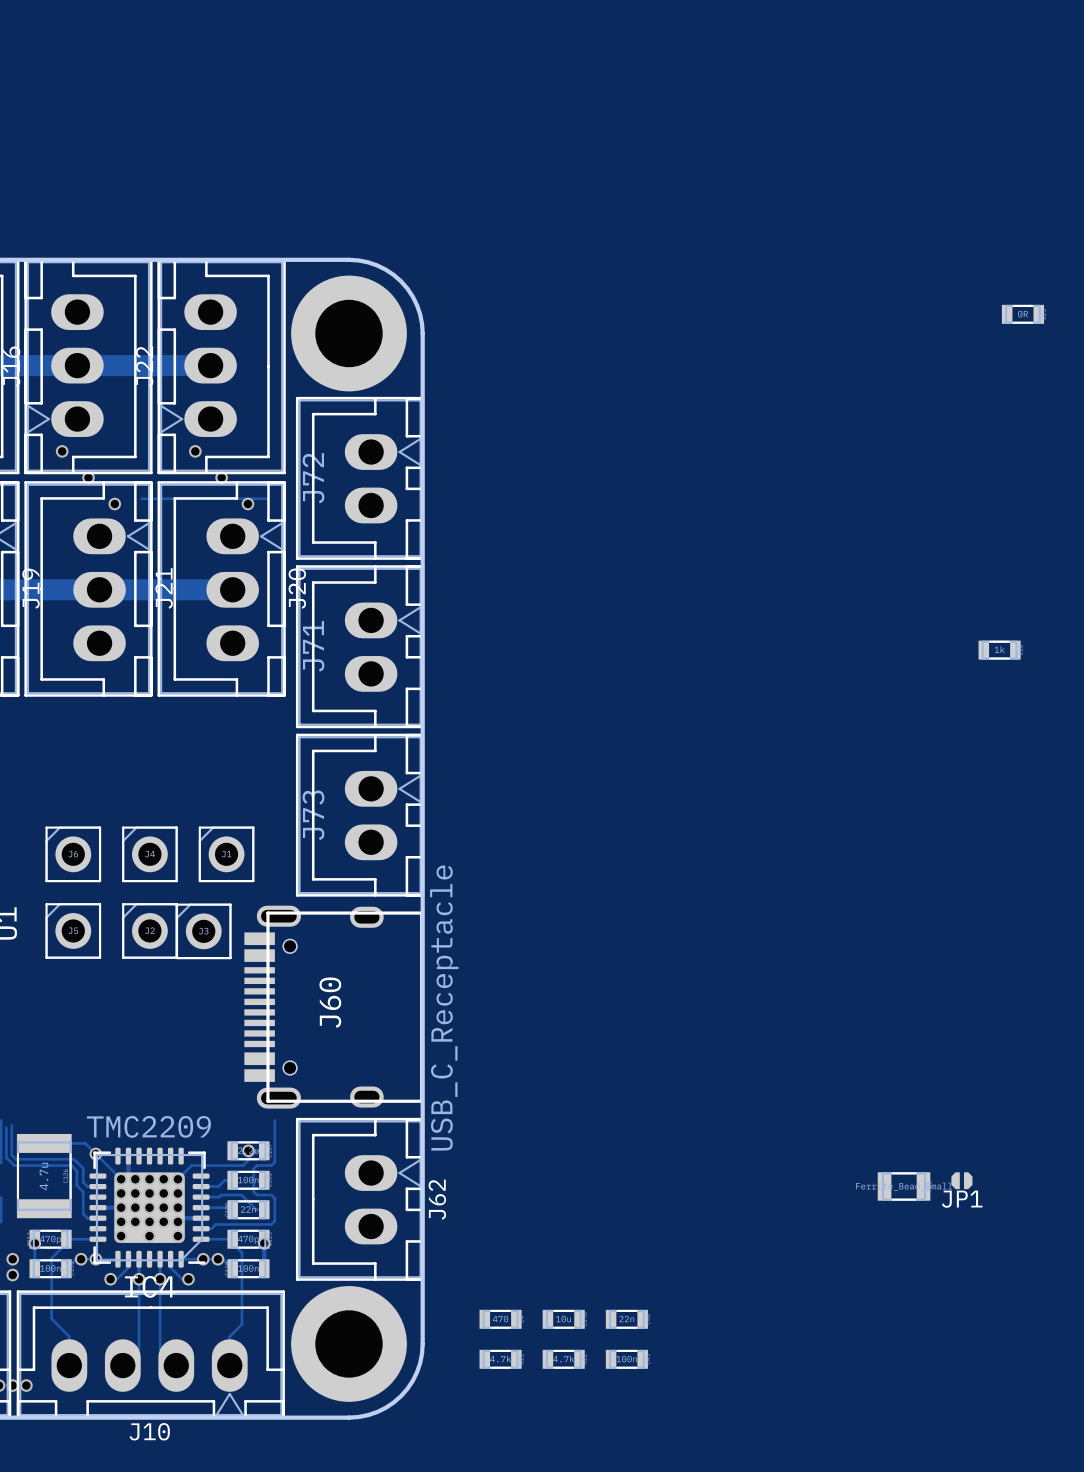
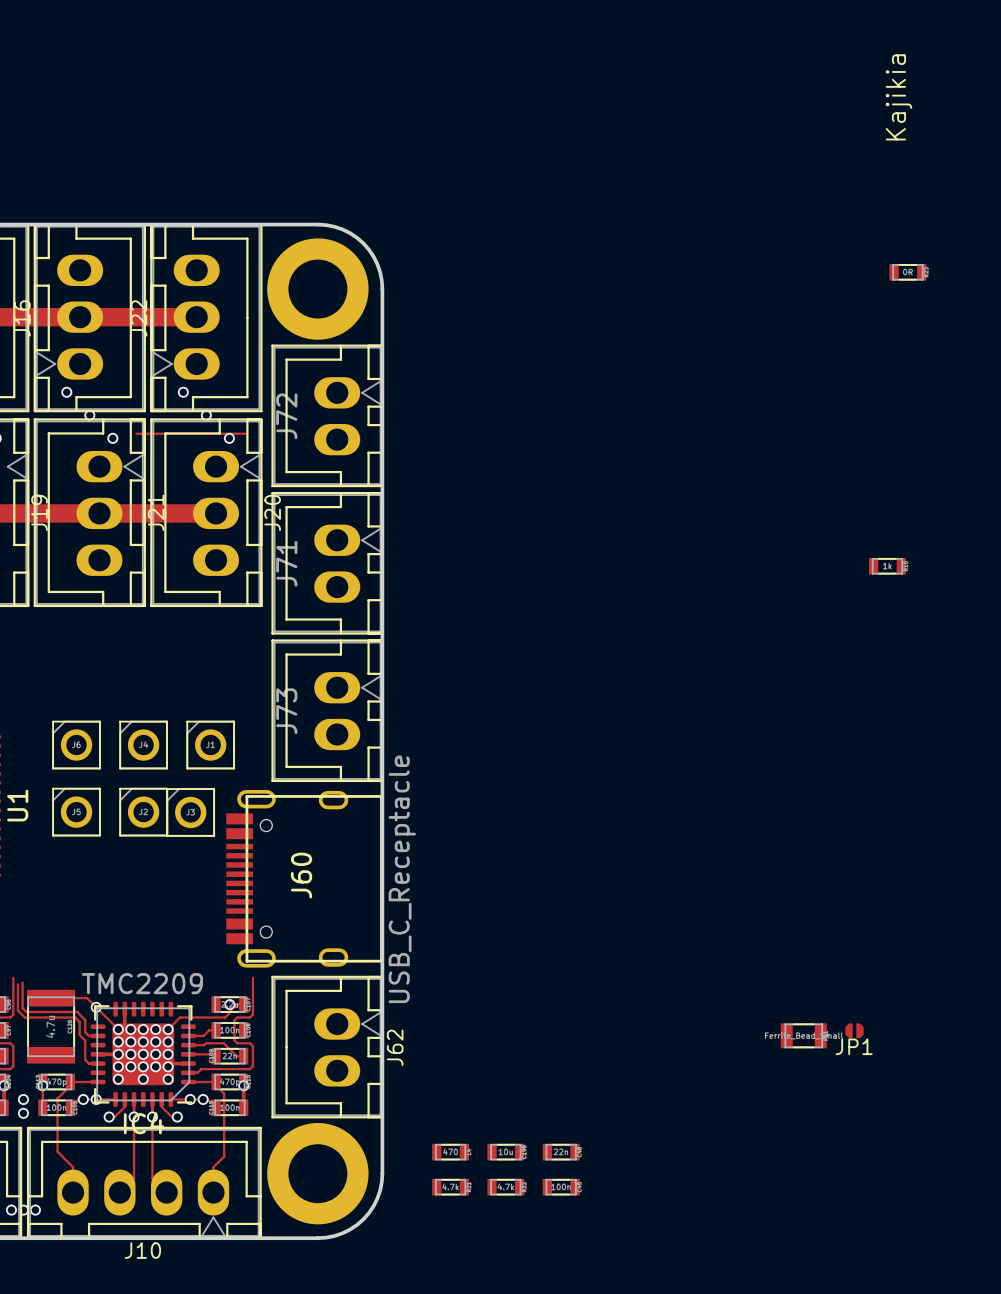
text: none -> Kajikia (898, 97)

